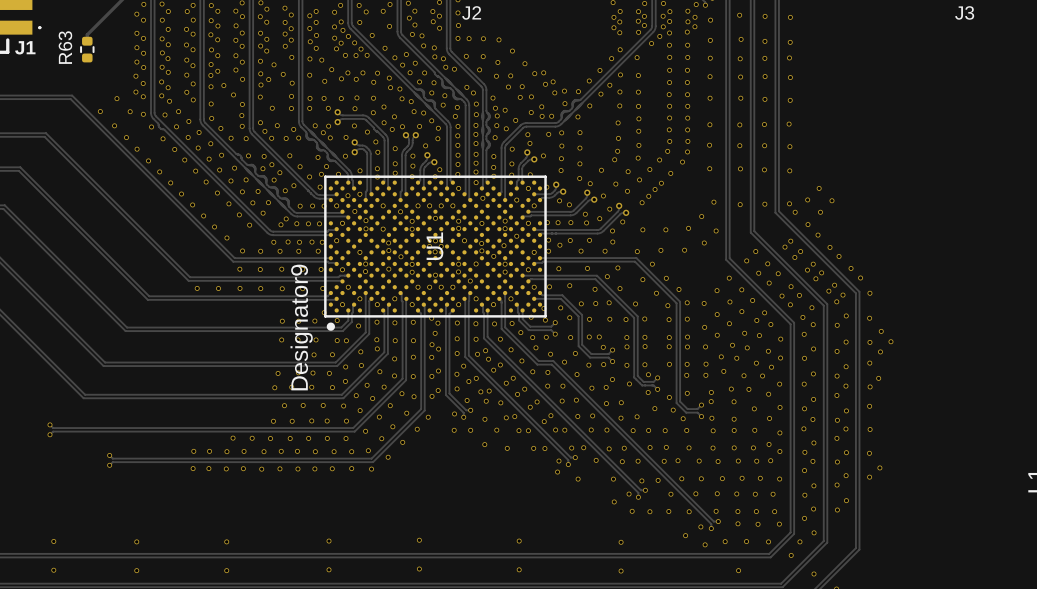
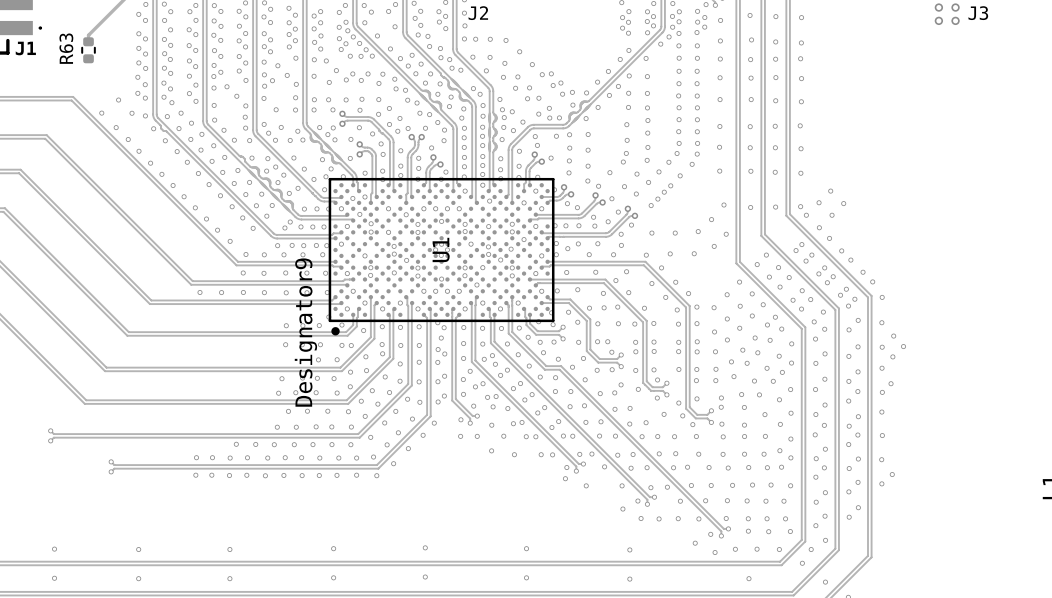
via: none -> (938, 7)
via: none -> (955, 7)
via: none -> (938, 20)
via: none -> (955, 20)

